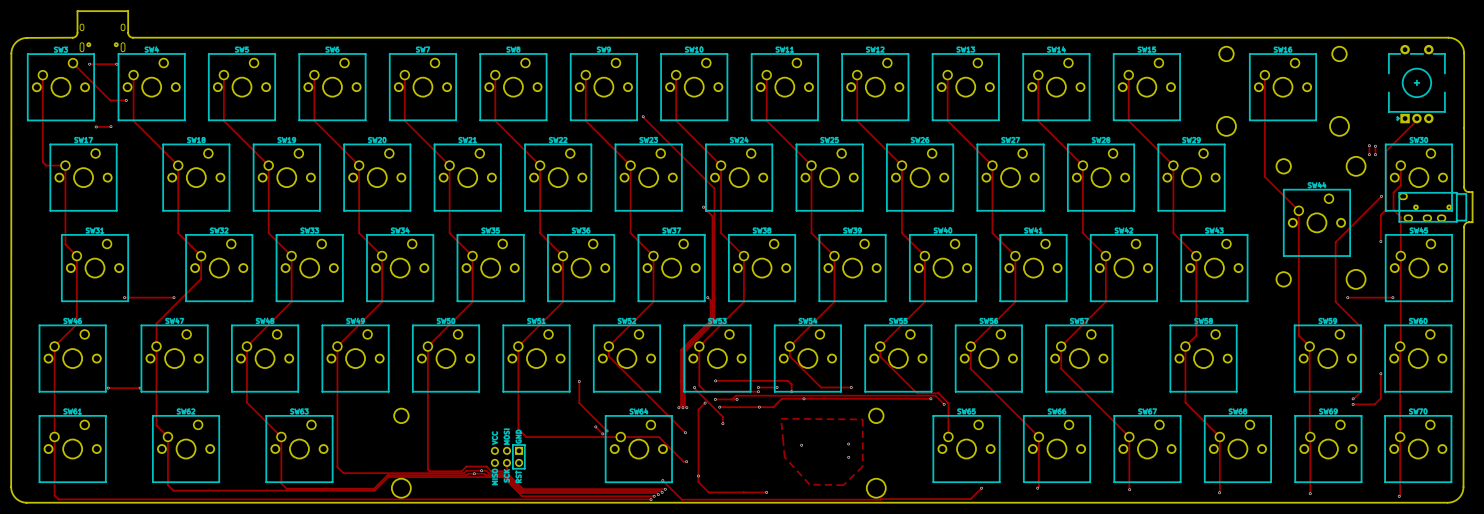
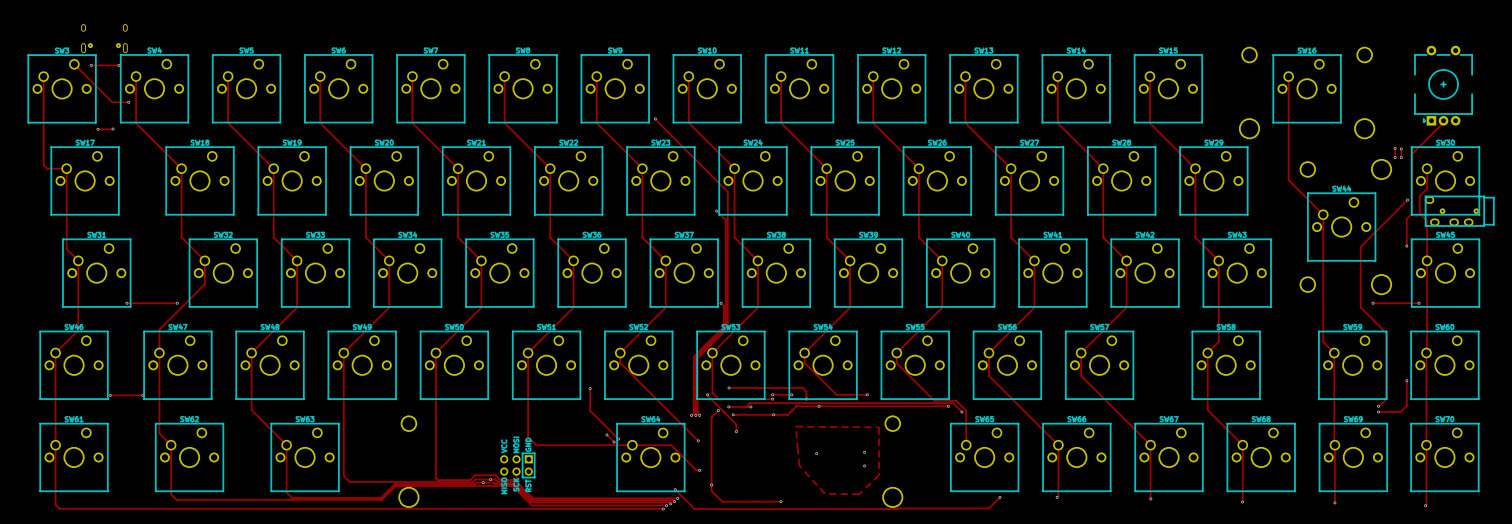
board edge: (26, 502) (1447, 502) -> none
board edge: (26, 502) (15, 498) (11, 487) (11, 51) (15, 42) (23, 38) (75, 37) (77, 33) (77, 11) (128, 11) (128, 33) (132, 37) (1453, 38) (1460, 43) (1464, 51) (1464, 187) (1466, 191) (1472, 192) (1472, 222) (1466, 222) (1464, 227) (1463, 488) (1458, 498) (1447, 502) -> none

